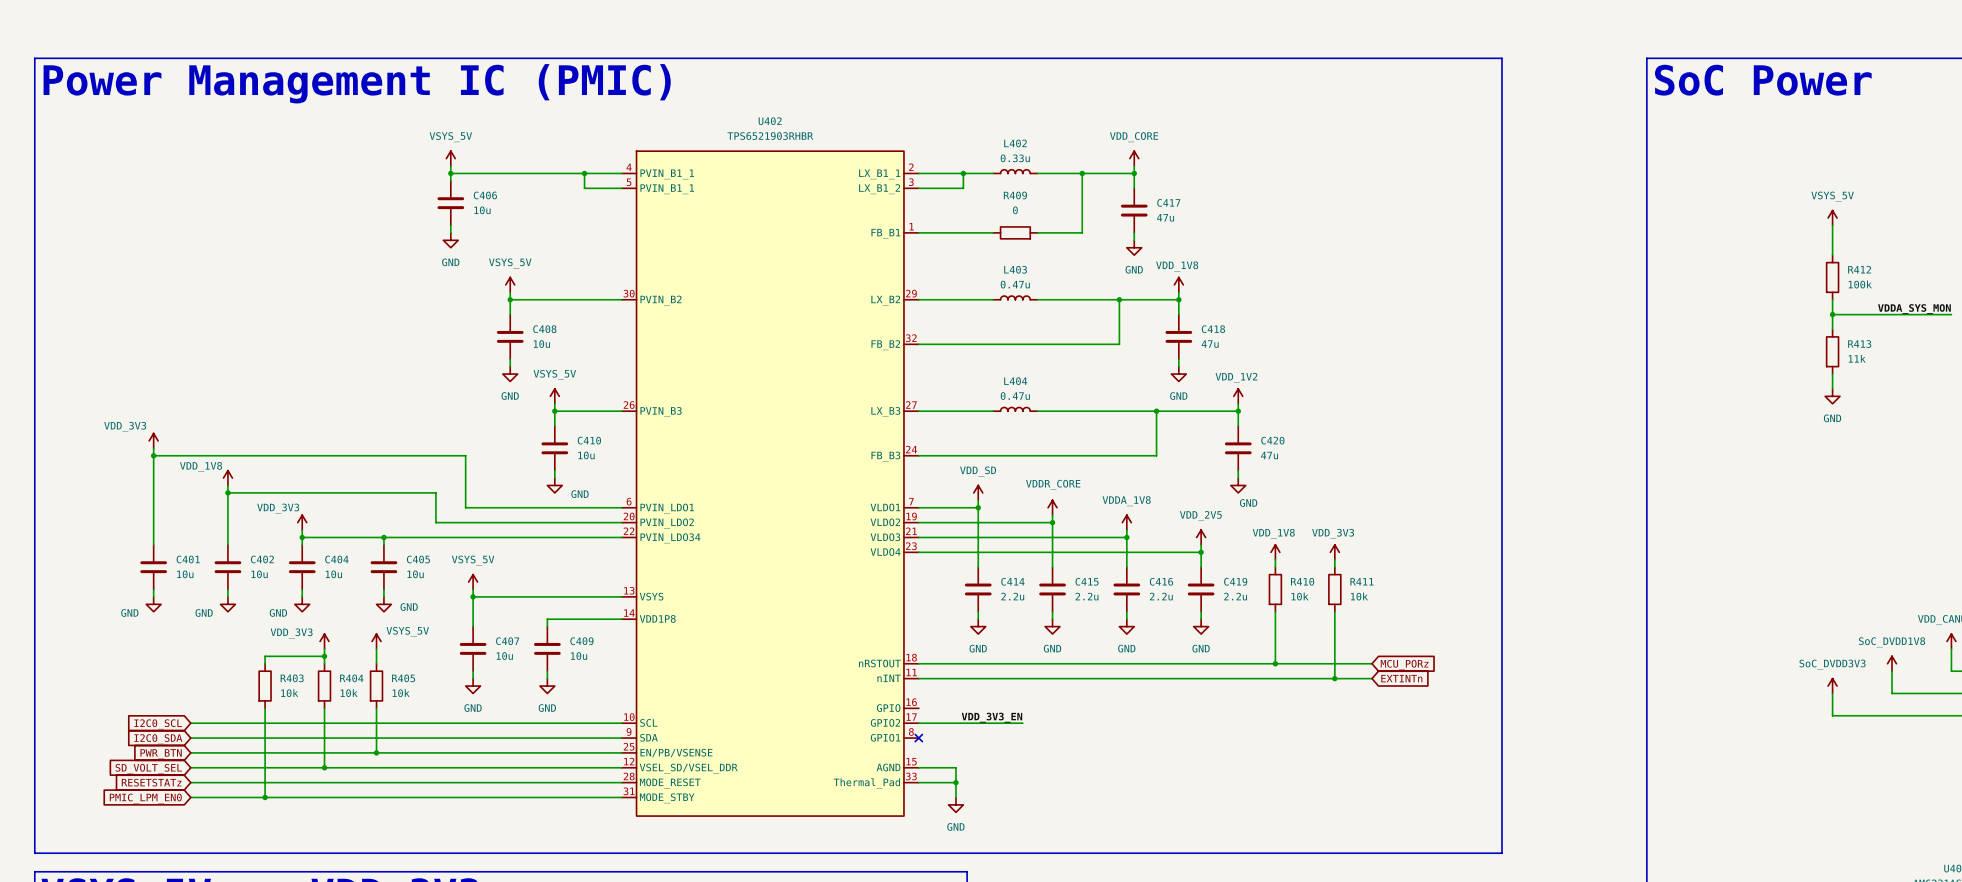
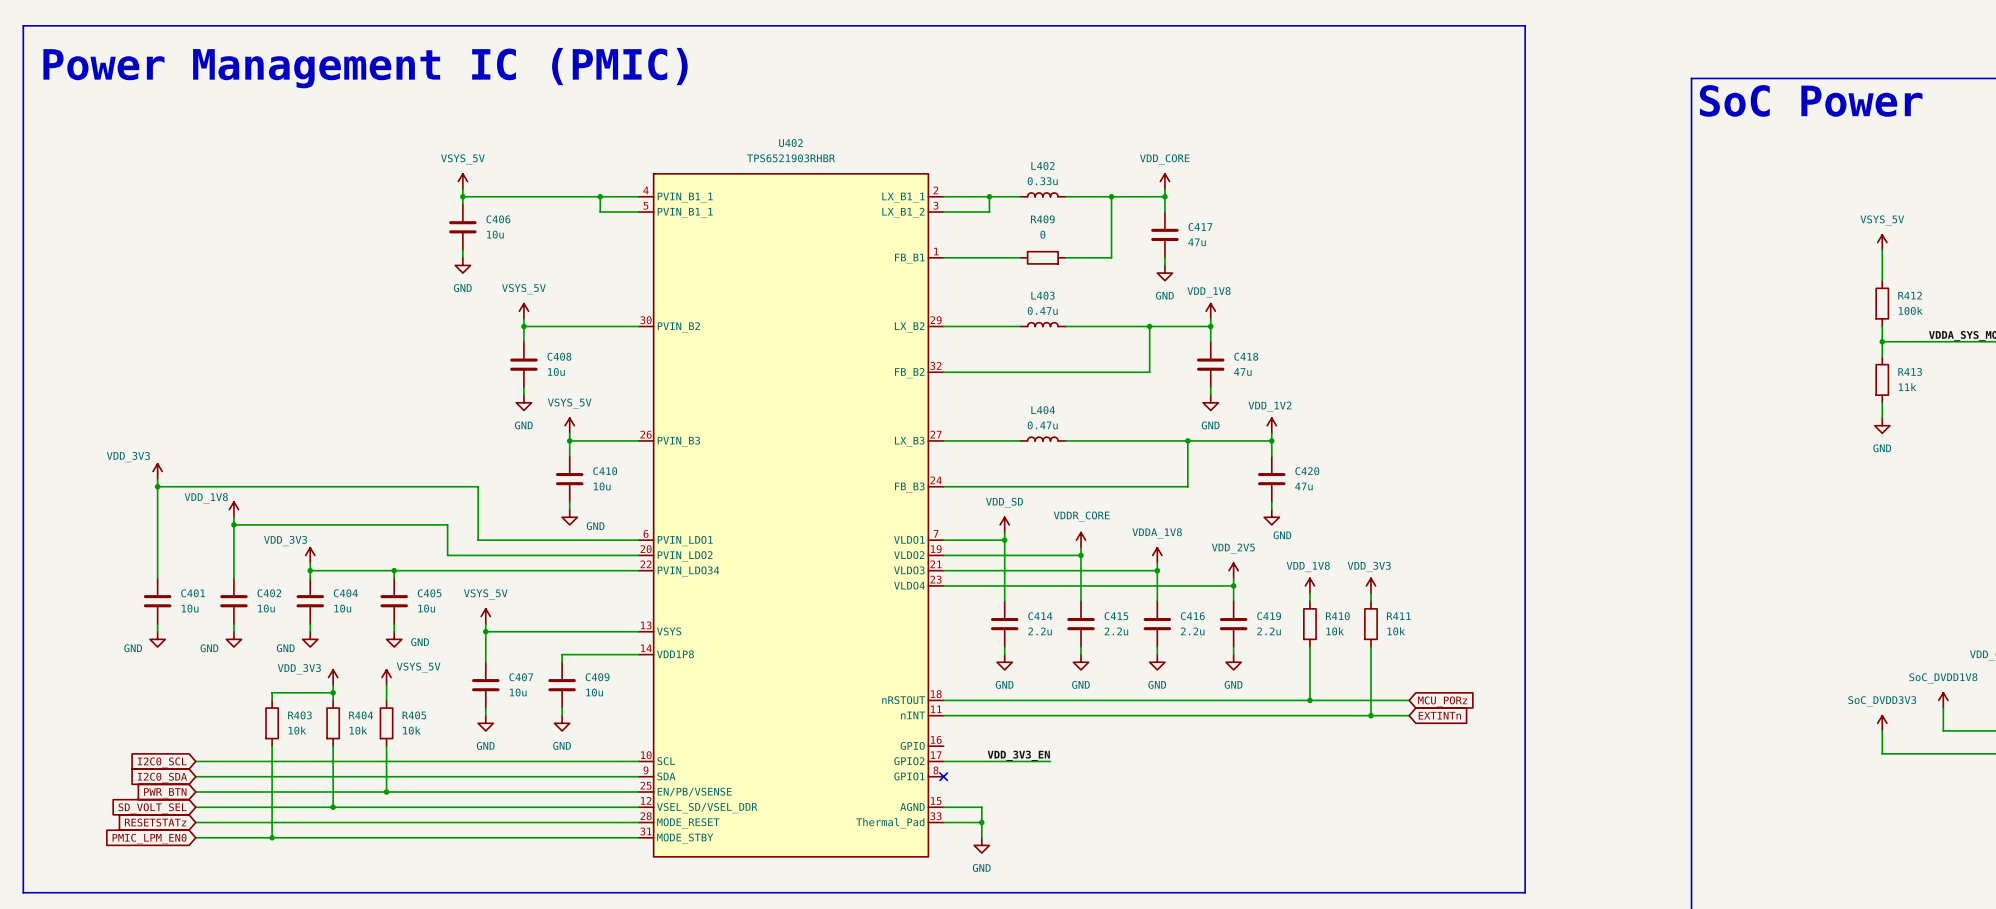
line: (34, 58) (34, 853) (1501, 853) (1501, 58) (34, 58) -> (23, 25) (23, 892) (1525, 892) (1525, 25) (23, 25)
text position: Power Management IC (PMIC) (357, 83) -> Power Management IC (PMIC) (365, 68)

